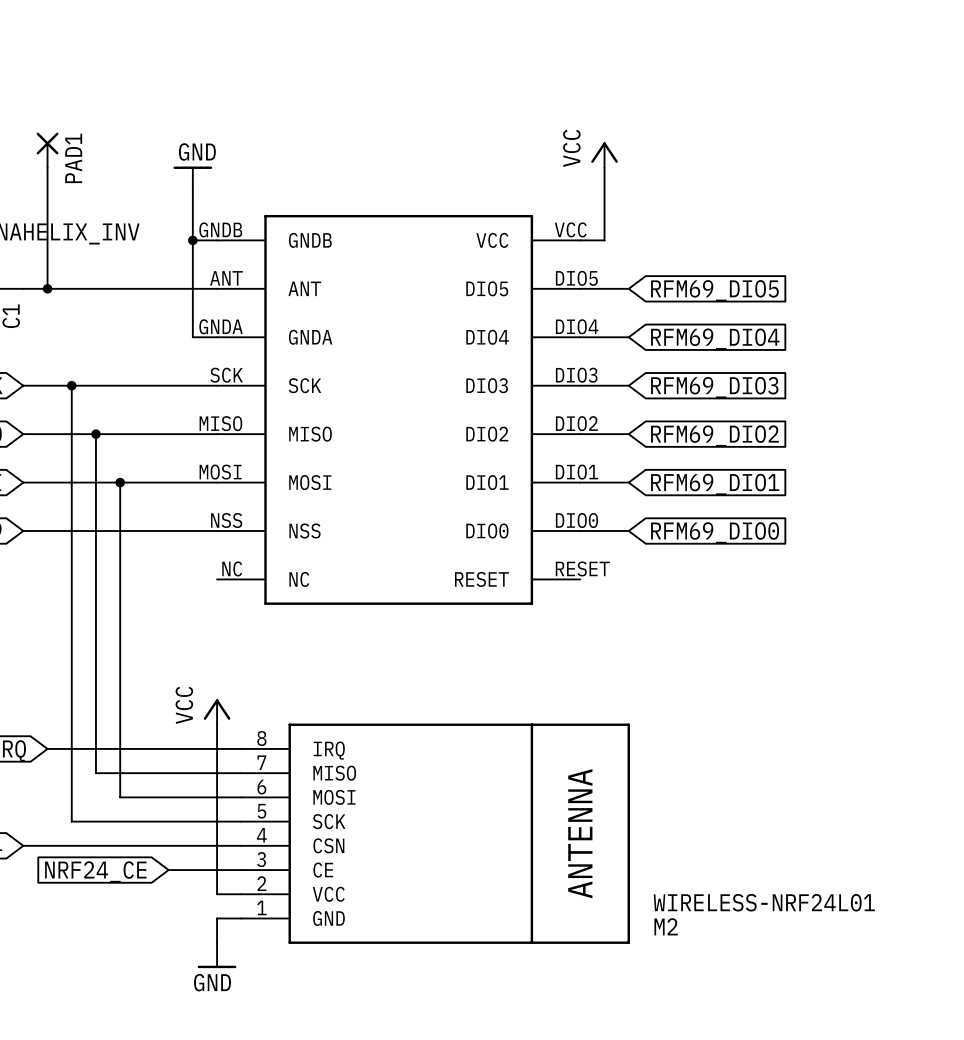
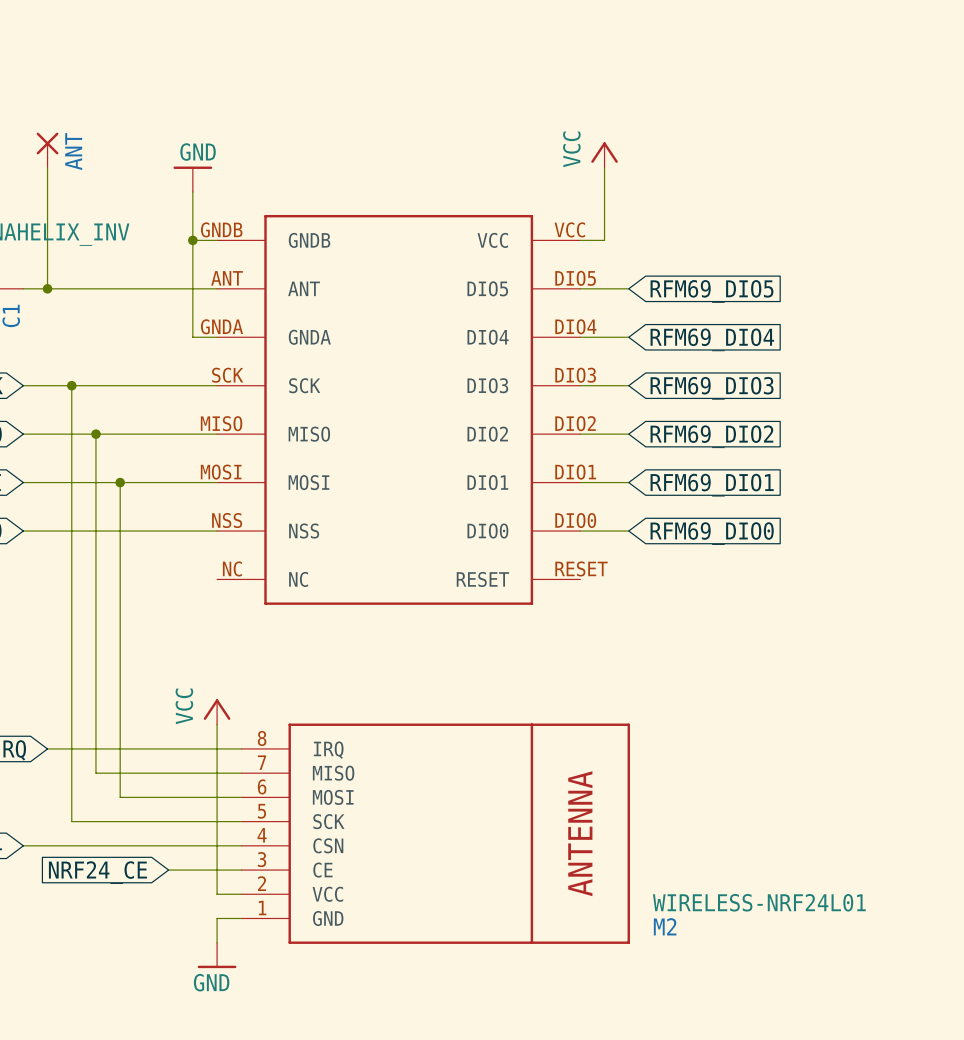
PAD1 name: PAD1 (73, 158) -> ANT (73, 151)

